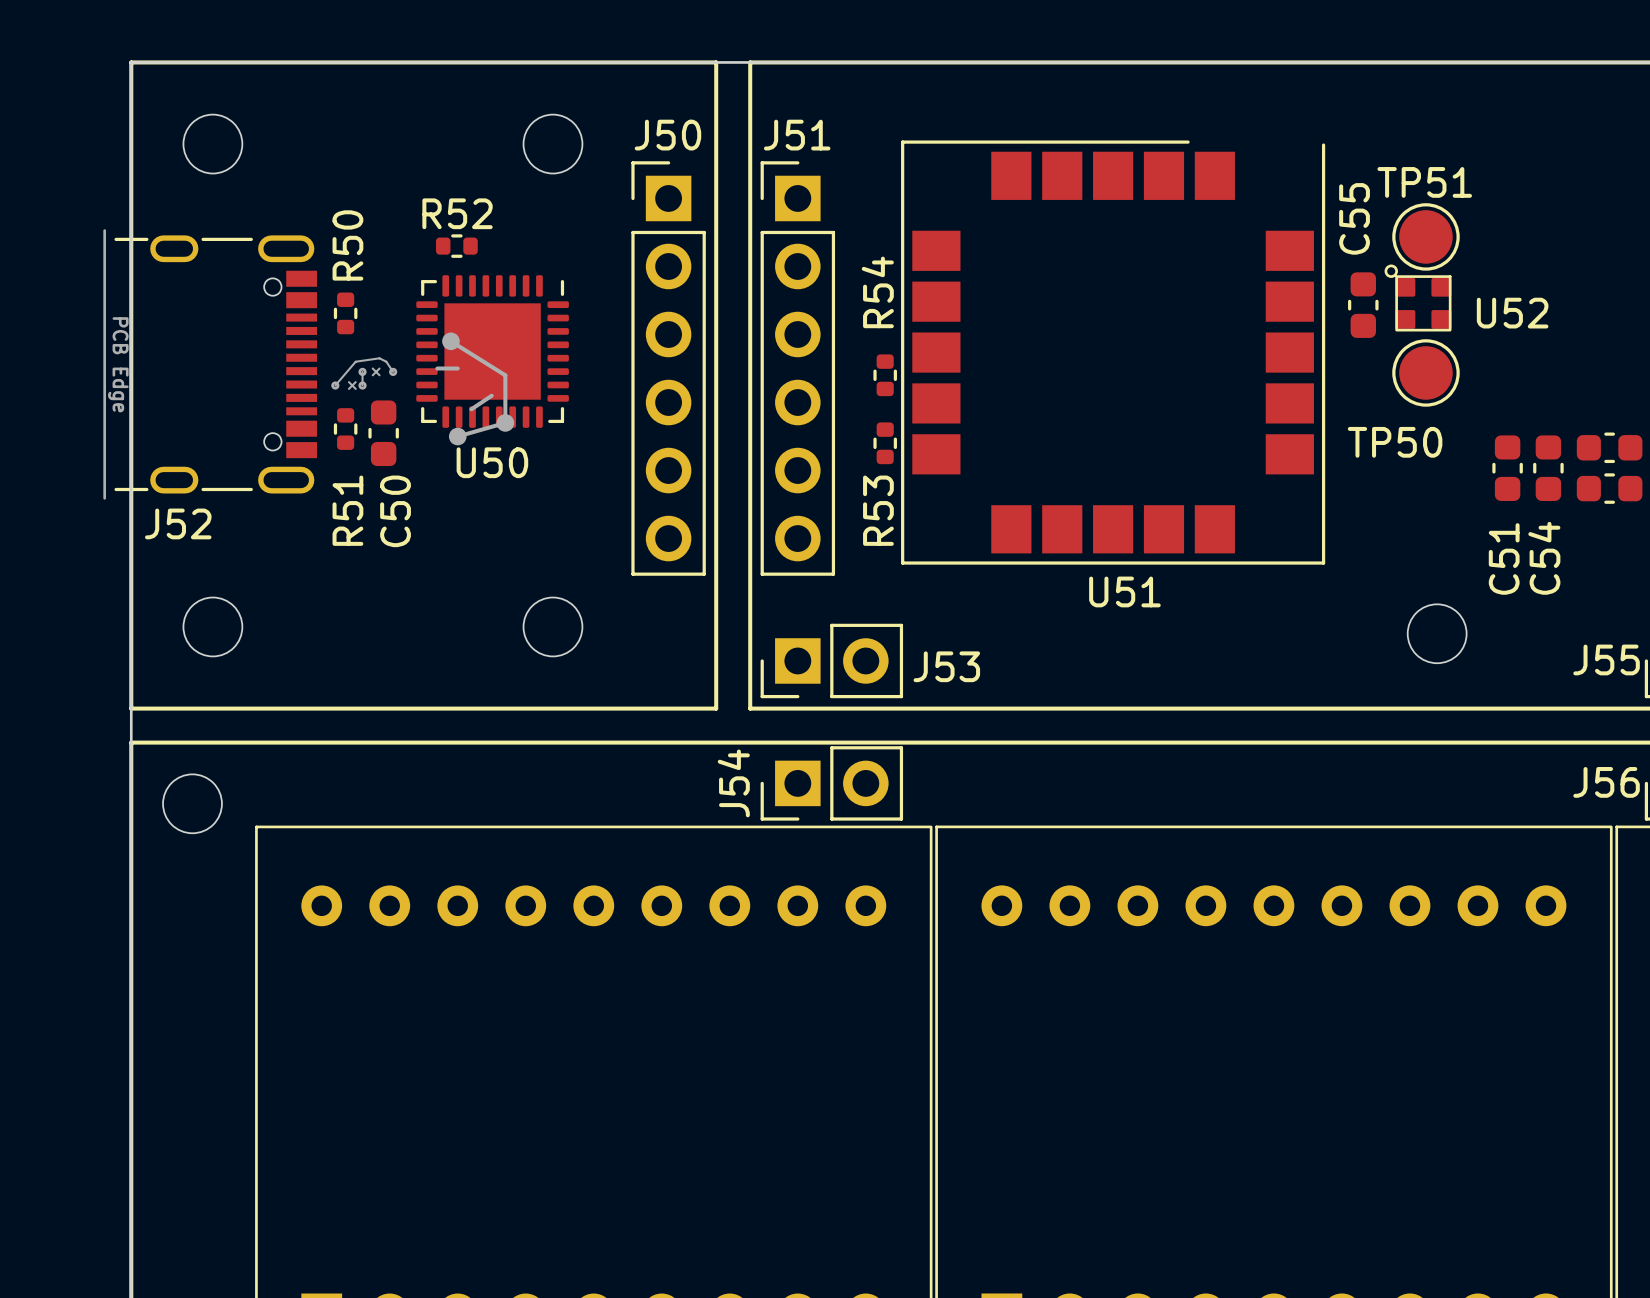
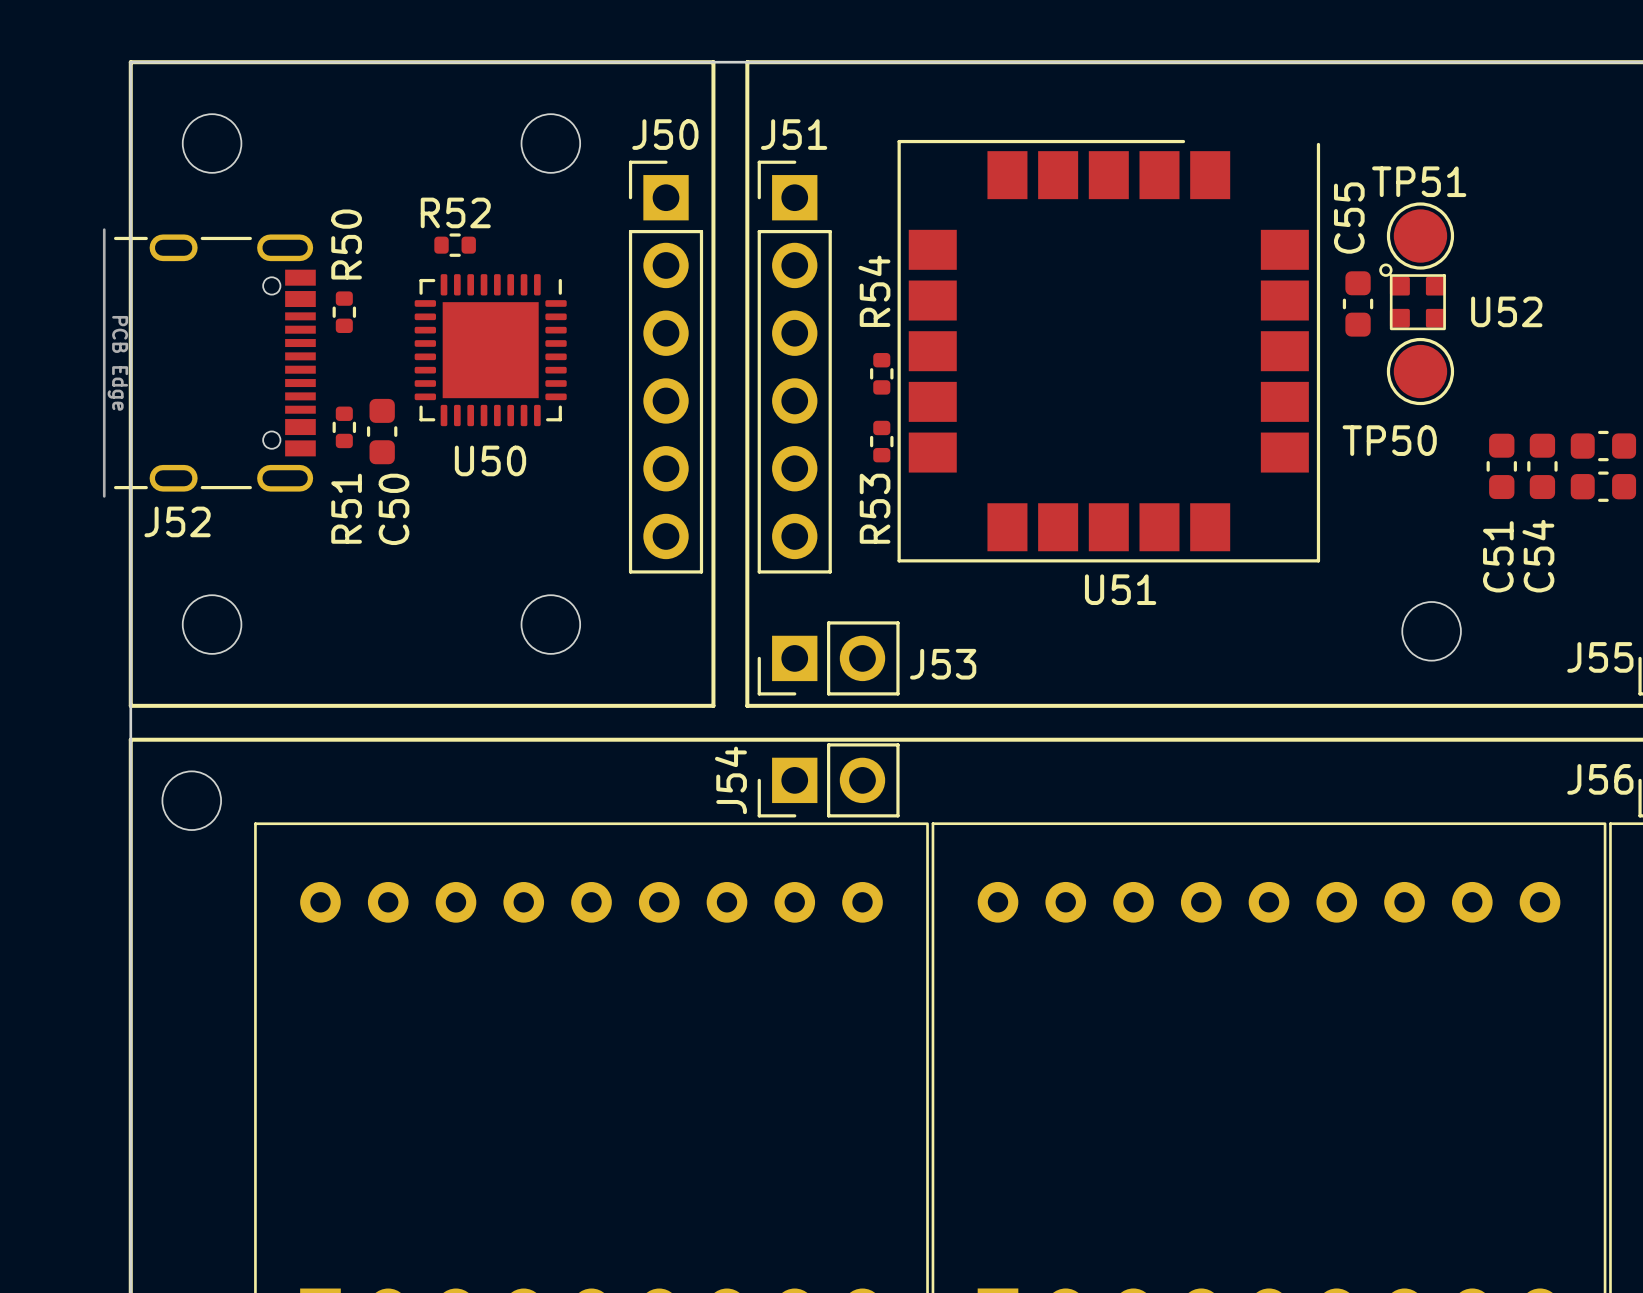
drawing: [442, 332, 460, 351] -> none
line: (450, 341) (505, 375) (505, 422) (457, 436) -> none
drawing: [331, 367, 398, 390] -> none
line: (372, 368) (379, 375) -> none
line: (379, 368) (372, 375) -> none
line: (437, 368) (457, 368) -> none
line: (362, 371) (362, 385) -> none
line: (393, 371) (386, 361) (379, 358) (355, 361) (335, 385) -> none
line: (348, 382) (355, 388) -> none
line: (355, 382) (348, 388) -> none
line: (491, 395) (471, 409) -> none
drawing: [448, 414, 515, 446] -> none

